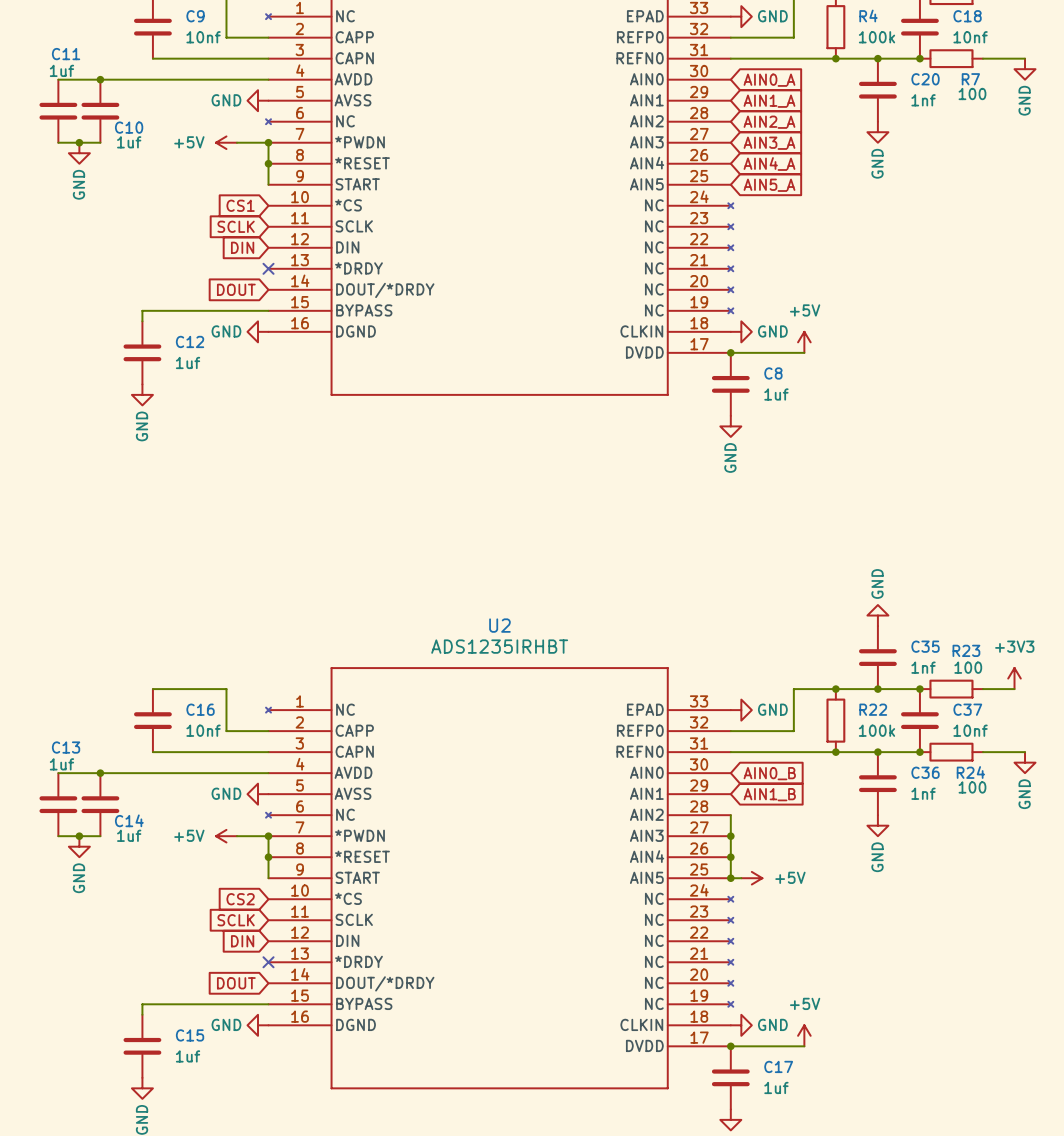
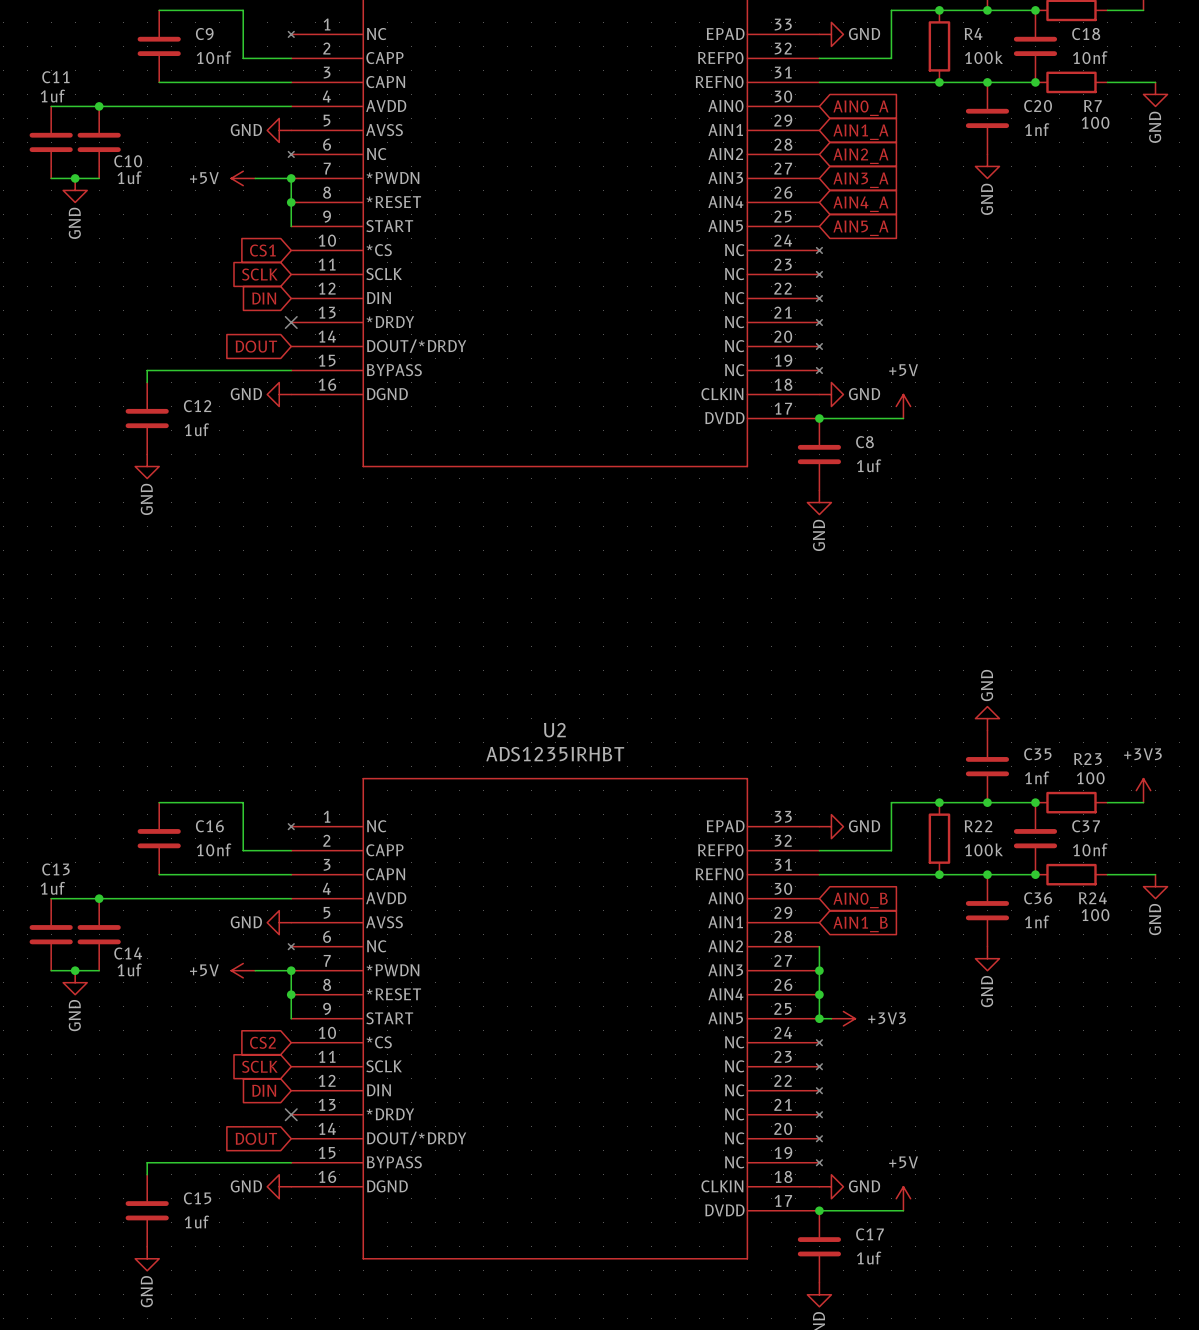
power symbol: +5V (751, 878) -> +3V3 (843, 1018)

